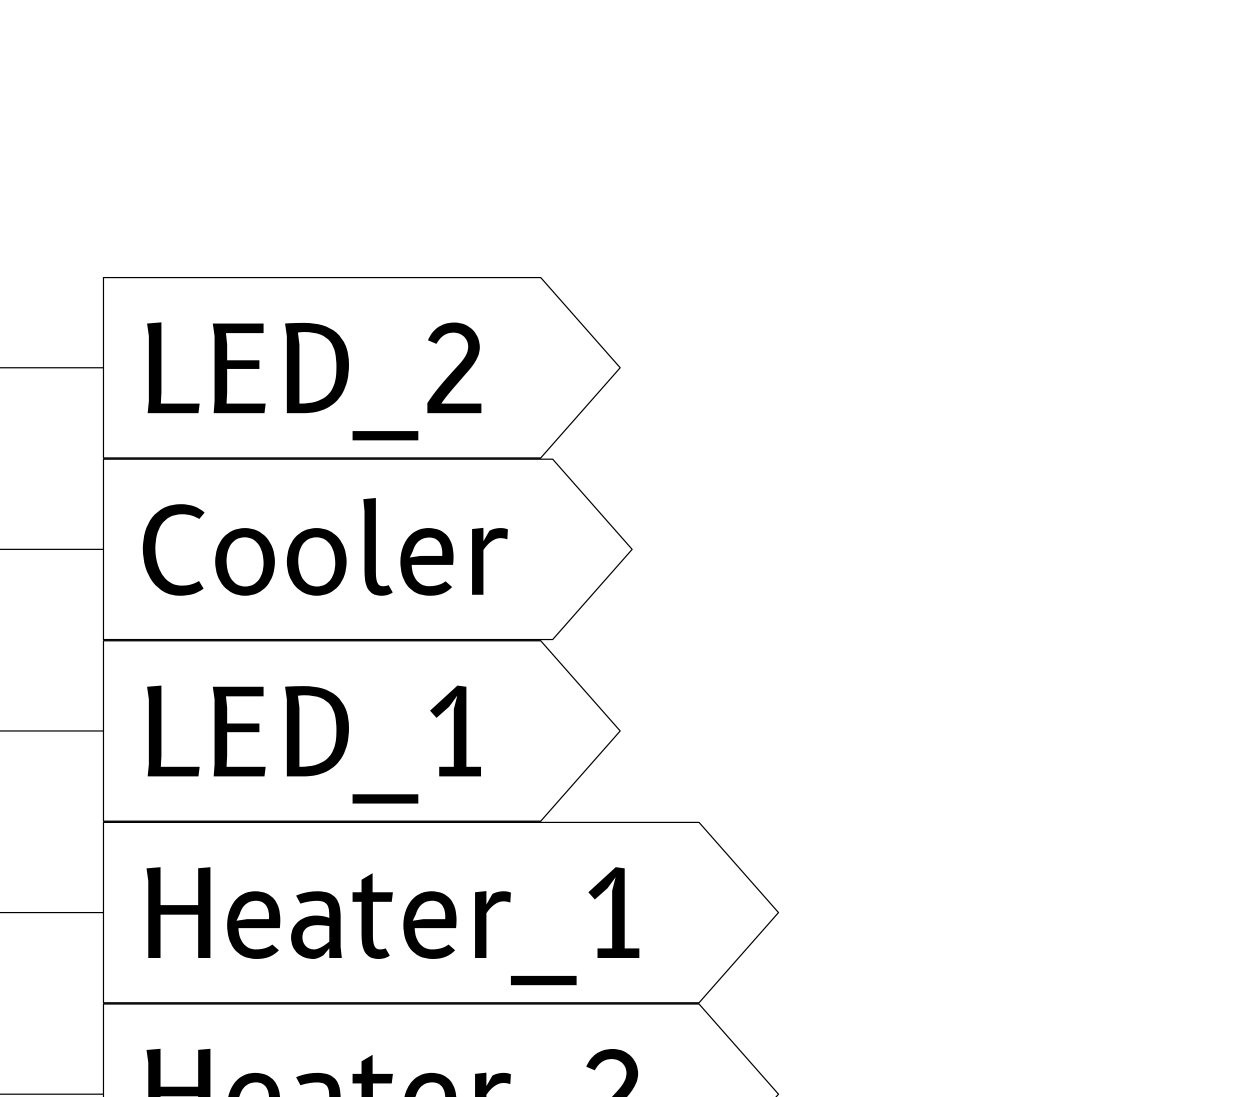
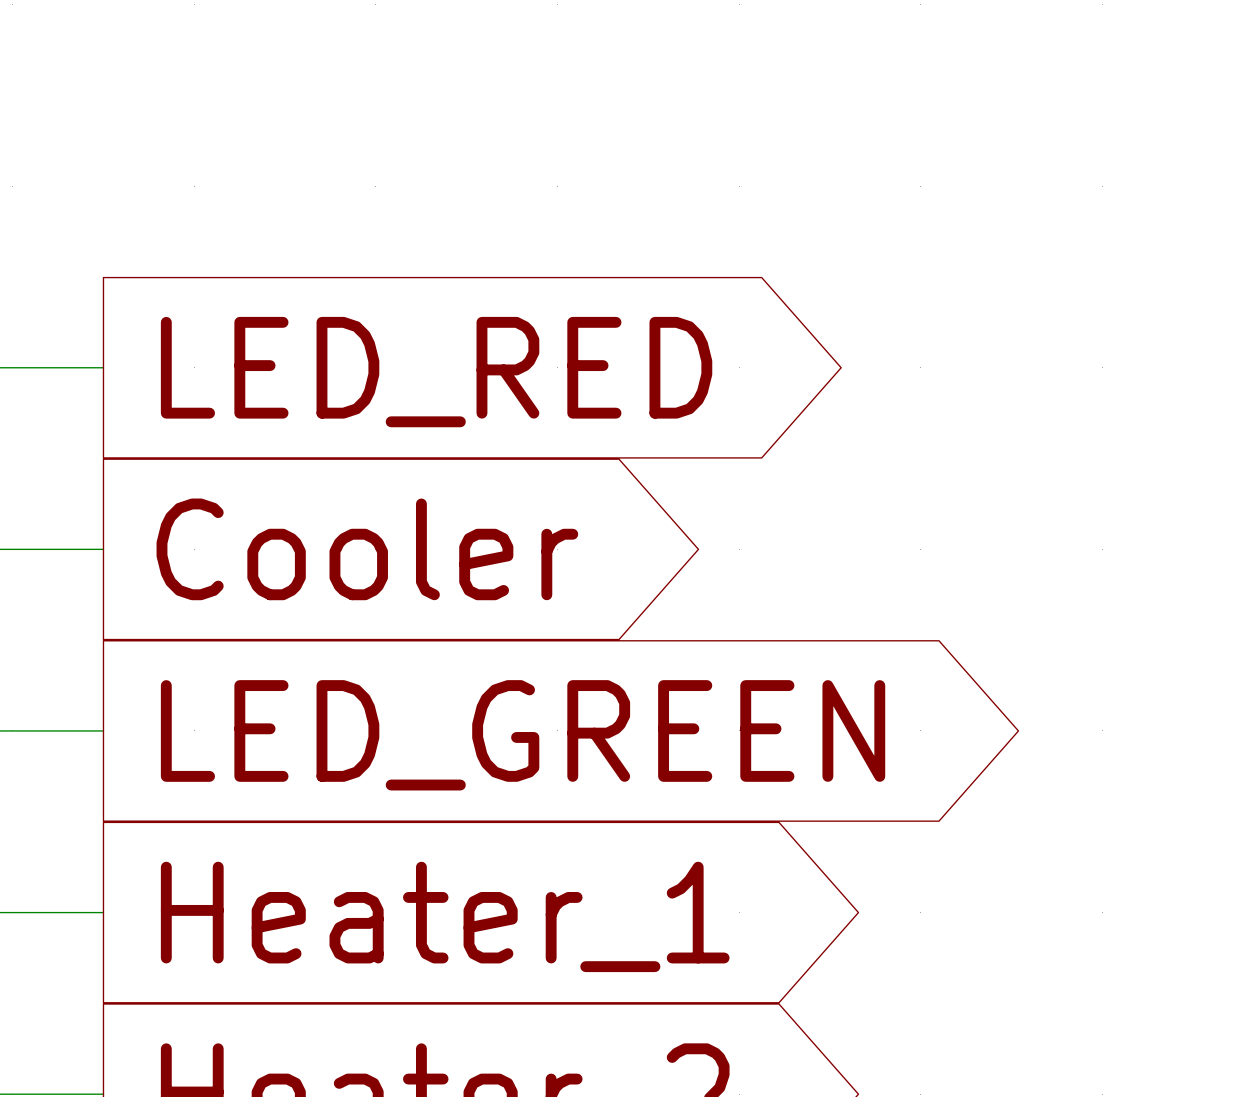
global label: LED_2 (314, 381) -> LED_RED (436, 372)
global label: LED_1 (314, 744) -> LED_GREEN (523, 735)

